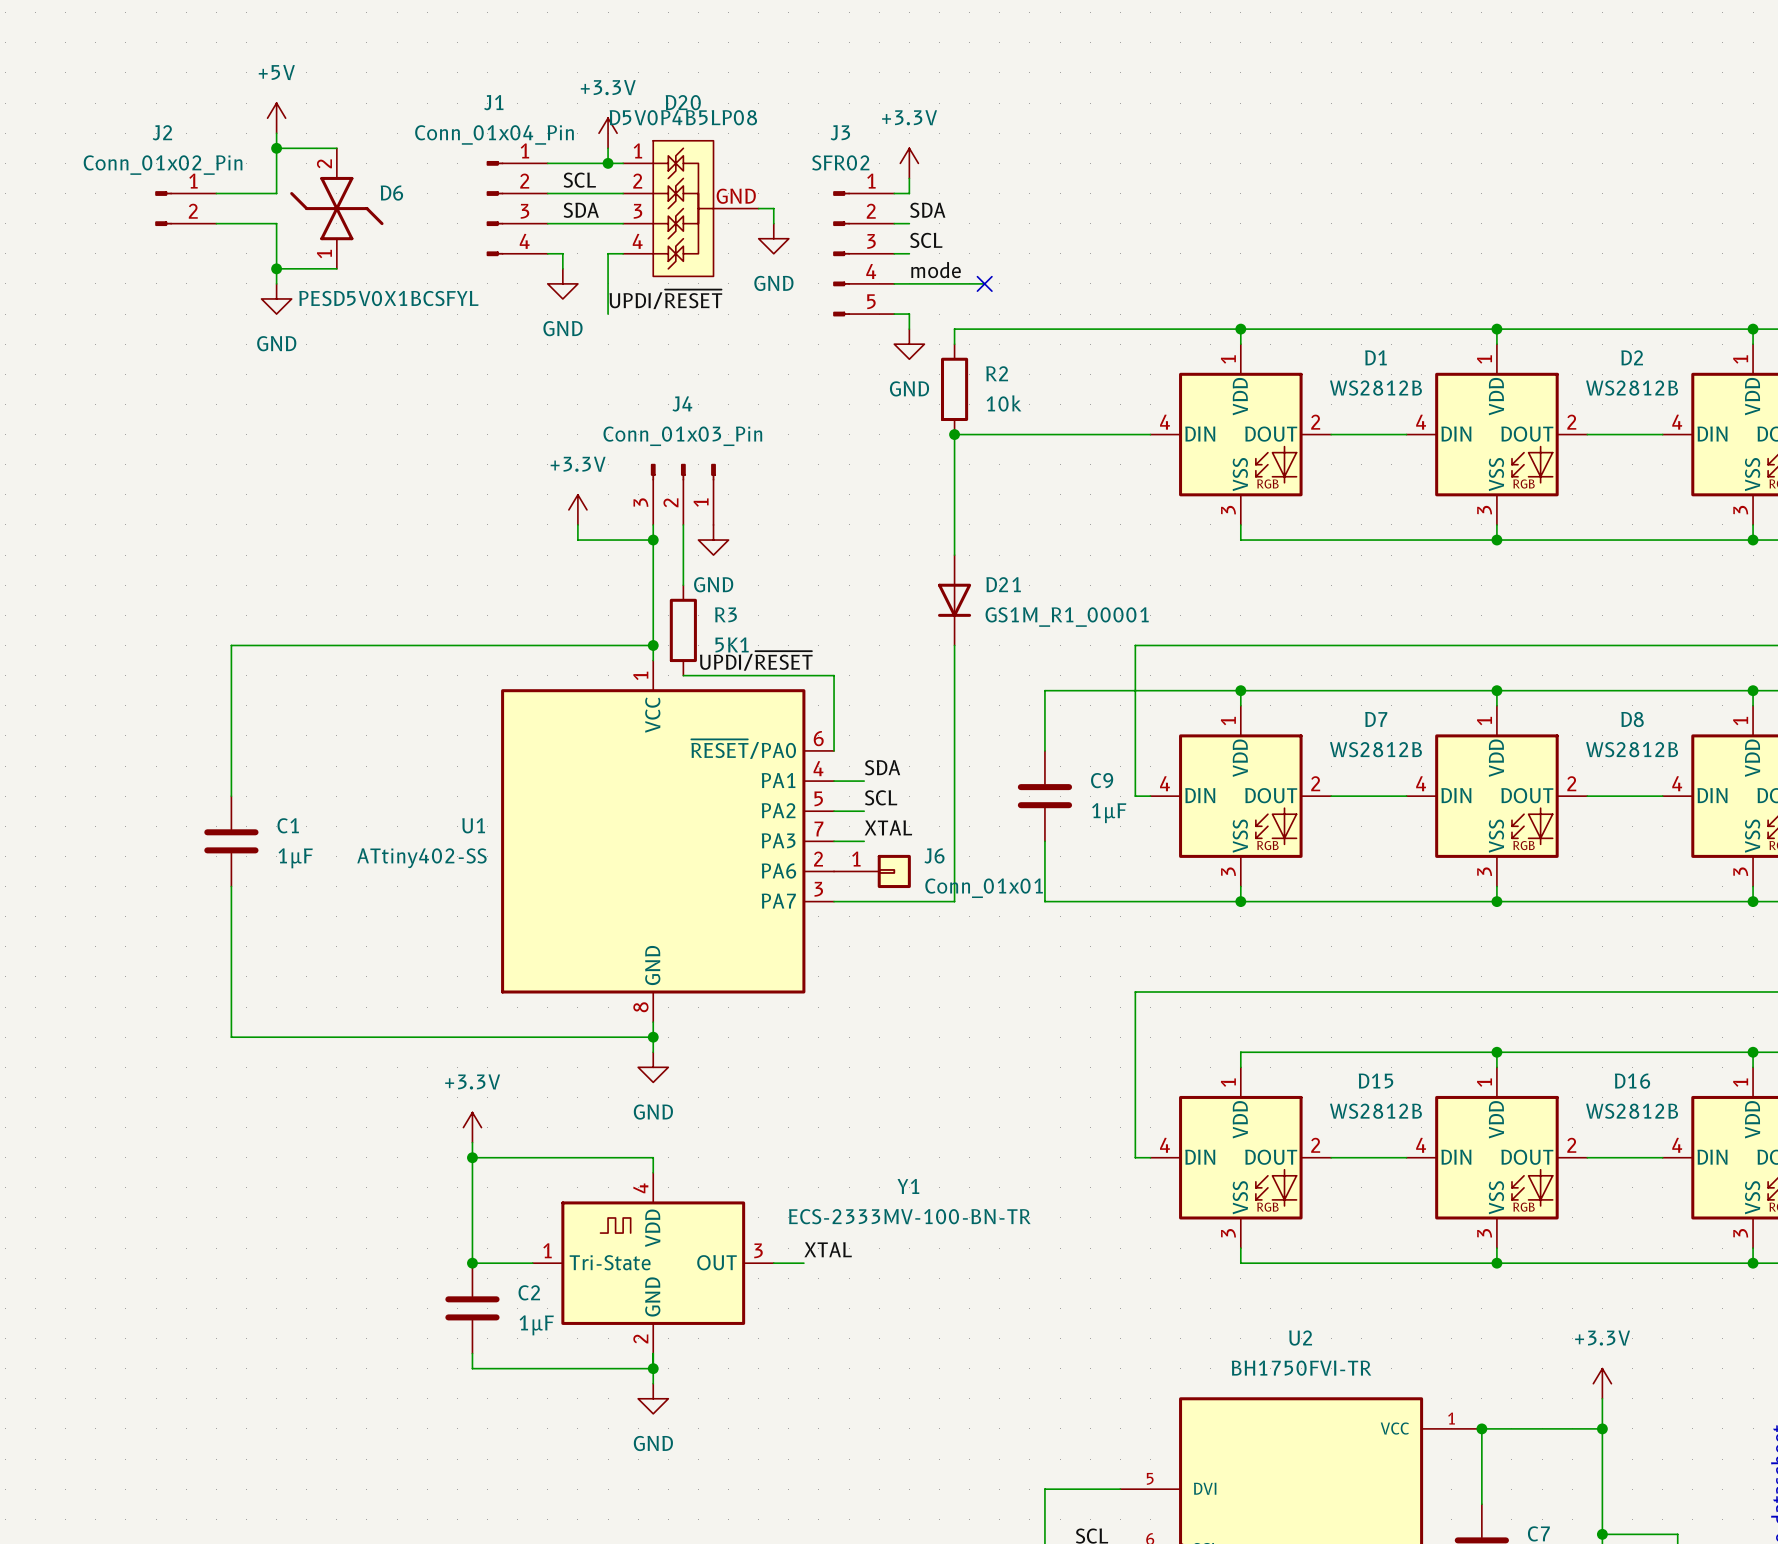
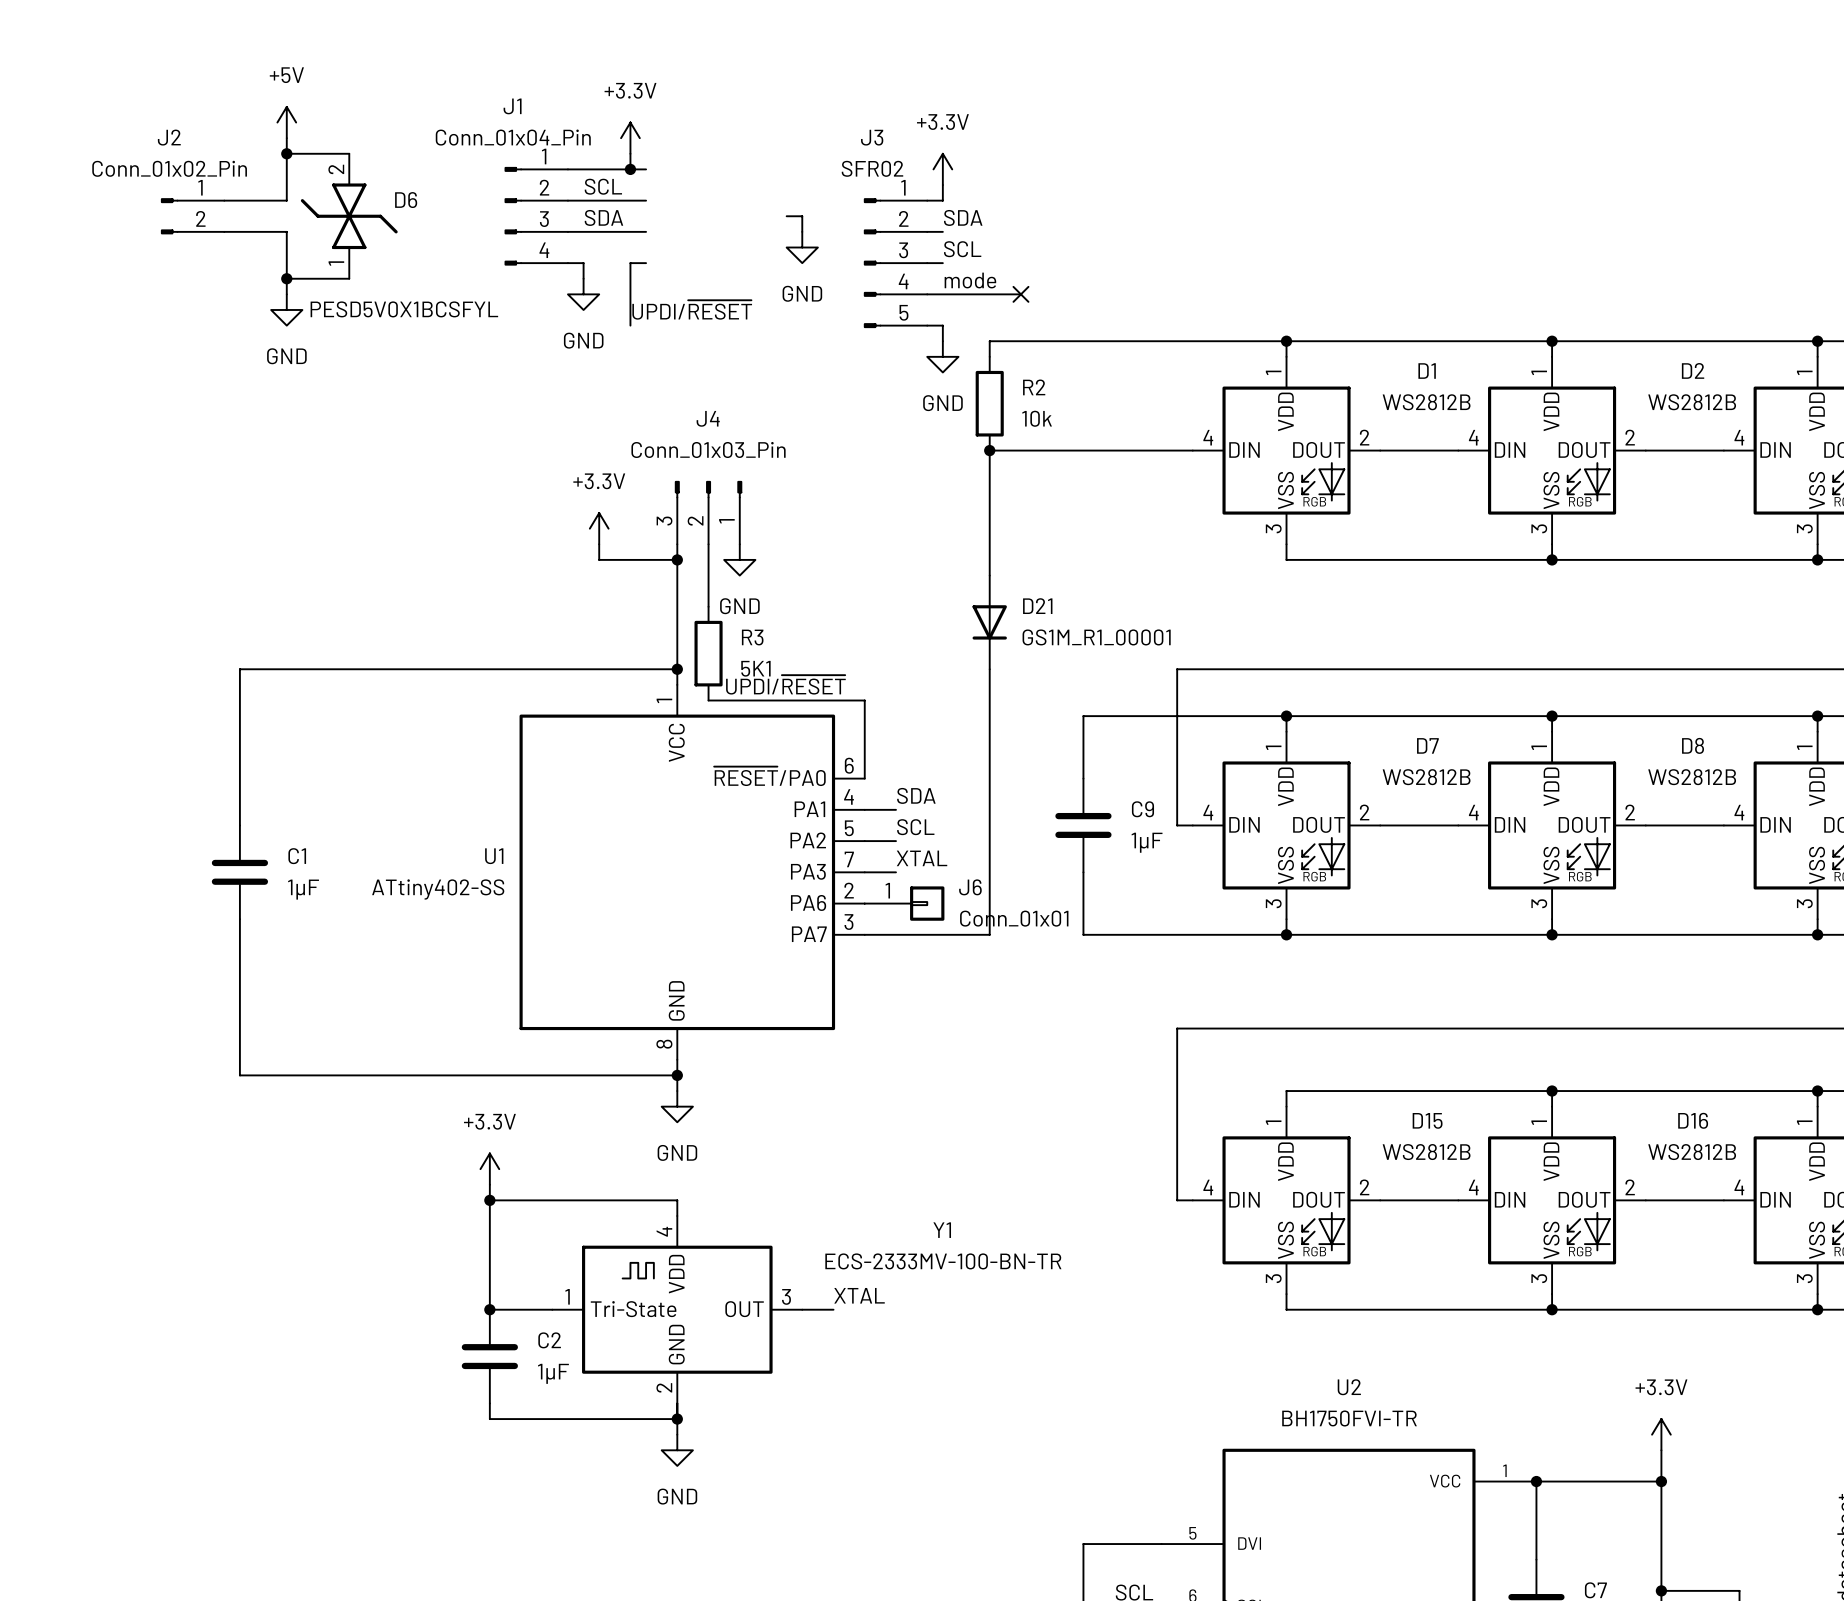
D20: D5V0P4B5LP08 (690, 208) -> none

